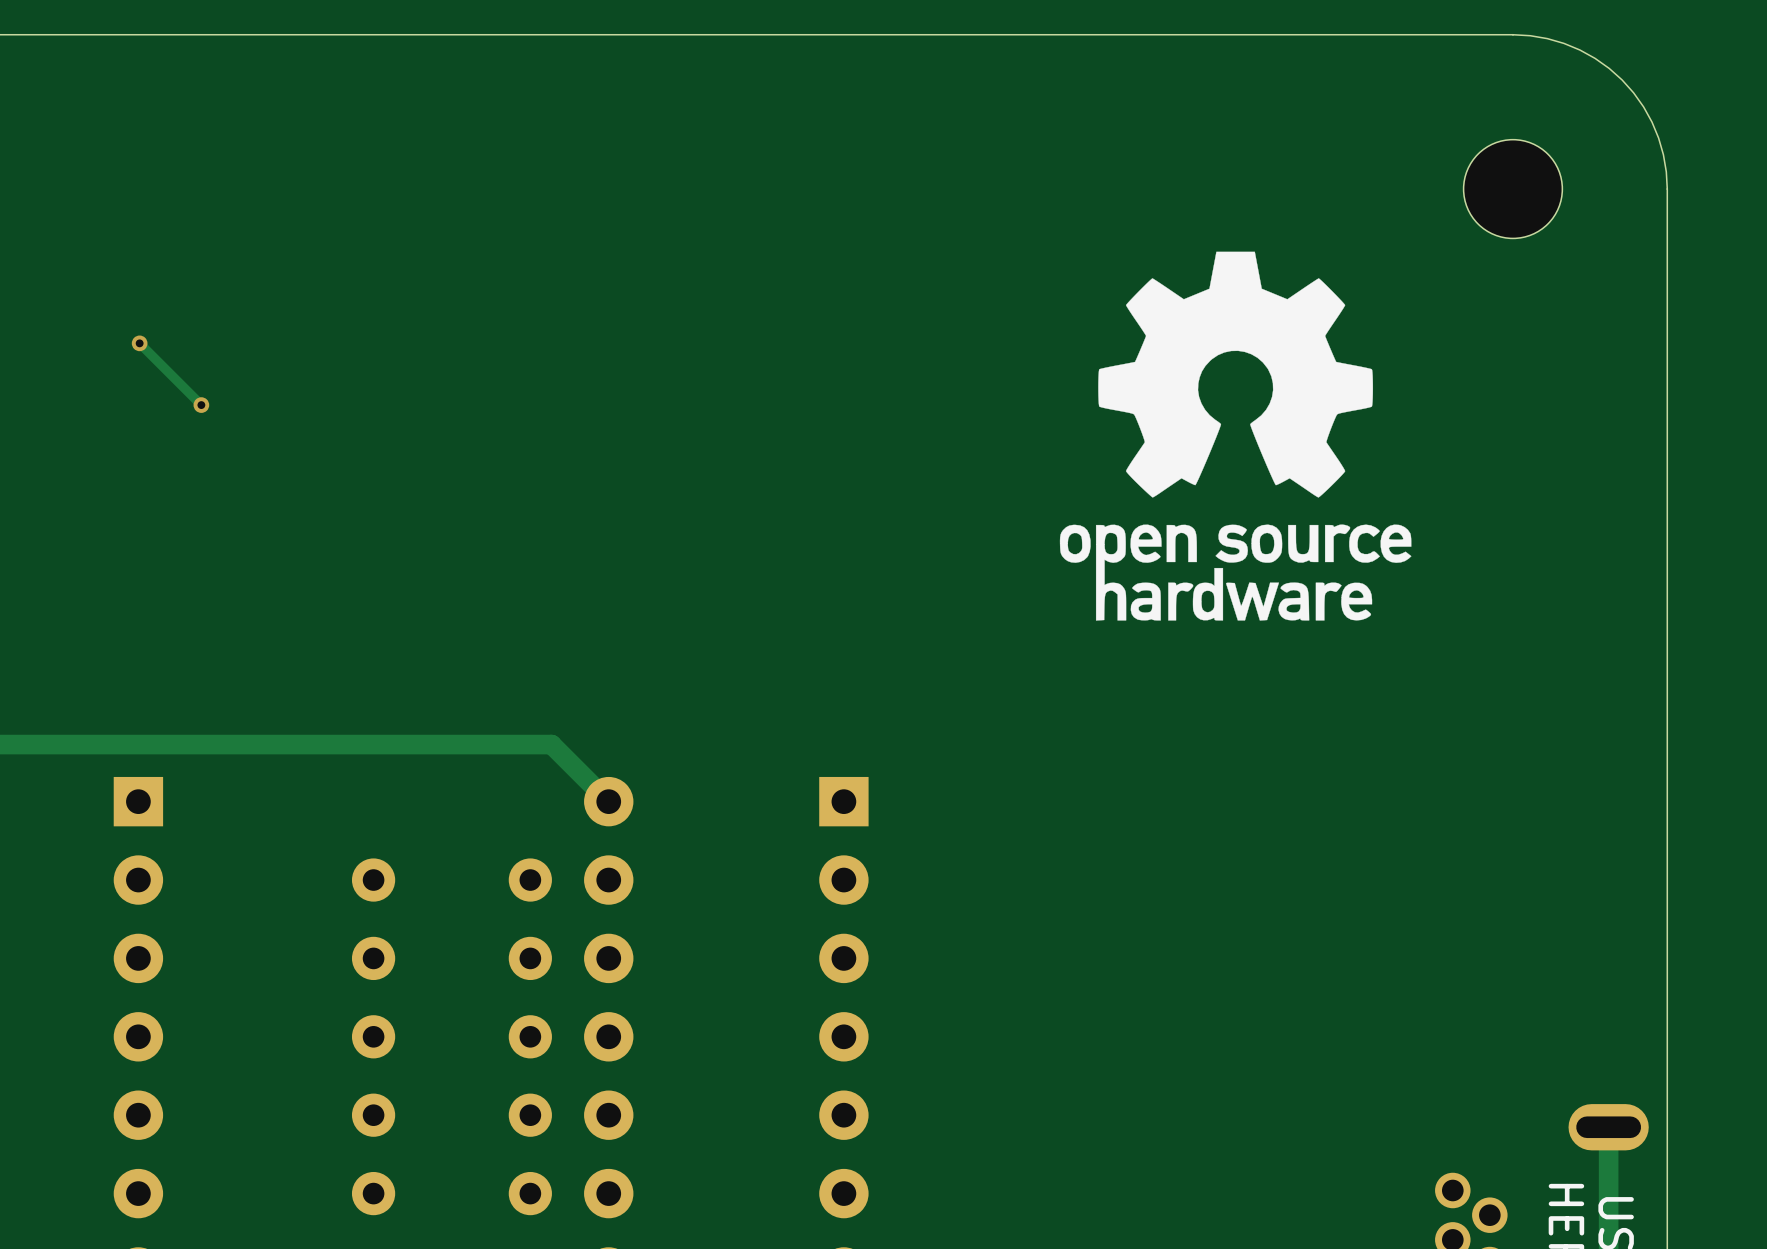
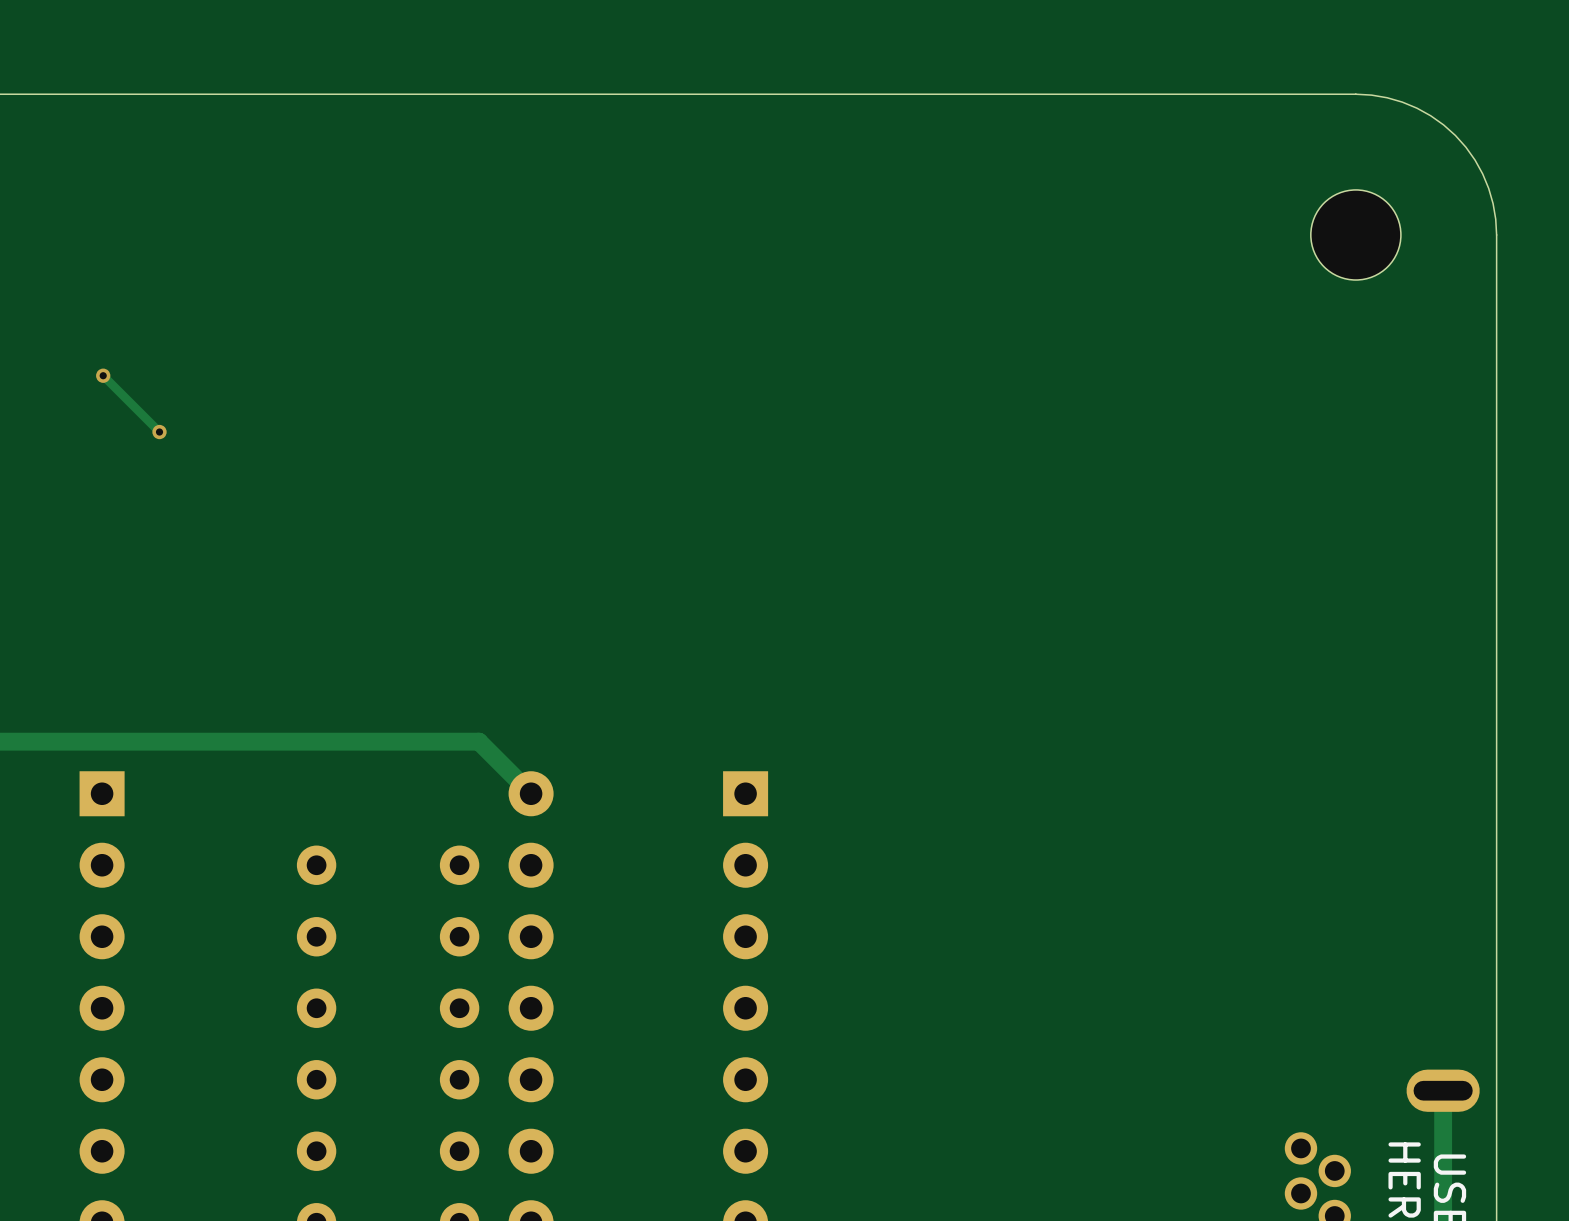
drawing: [1059, 251, 1412, 621] -> none

